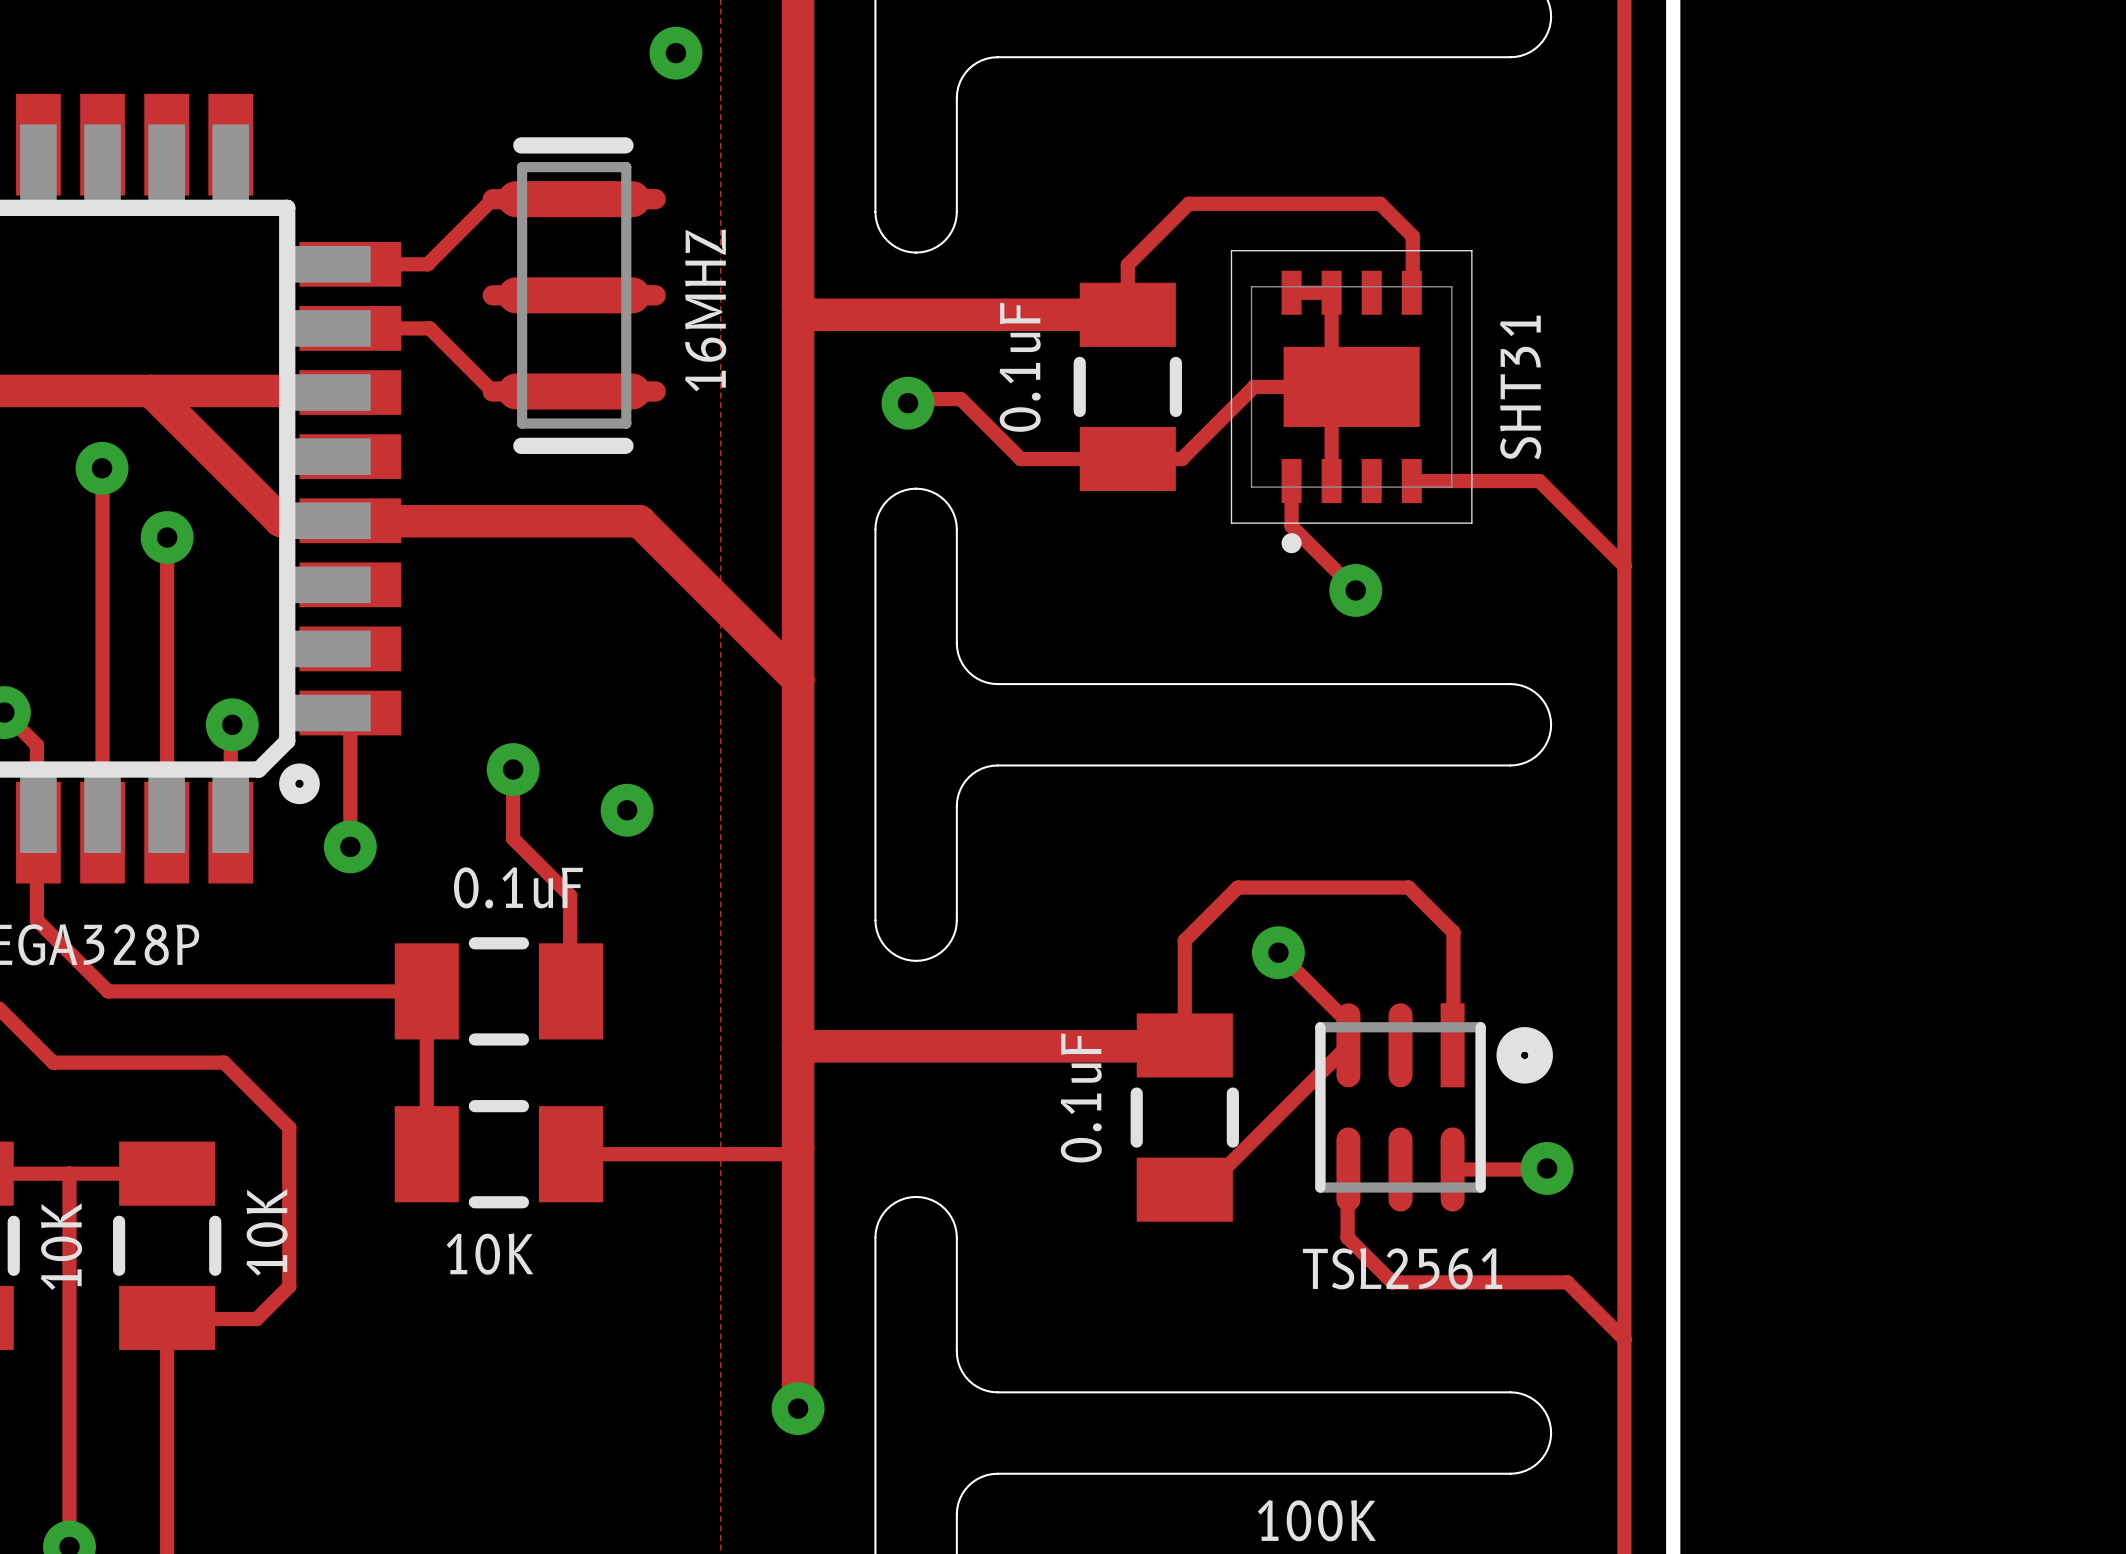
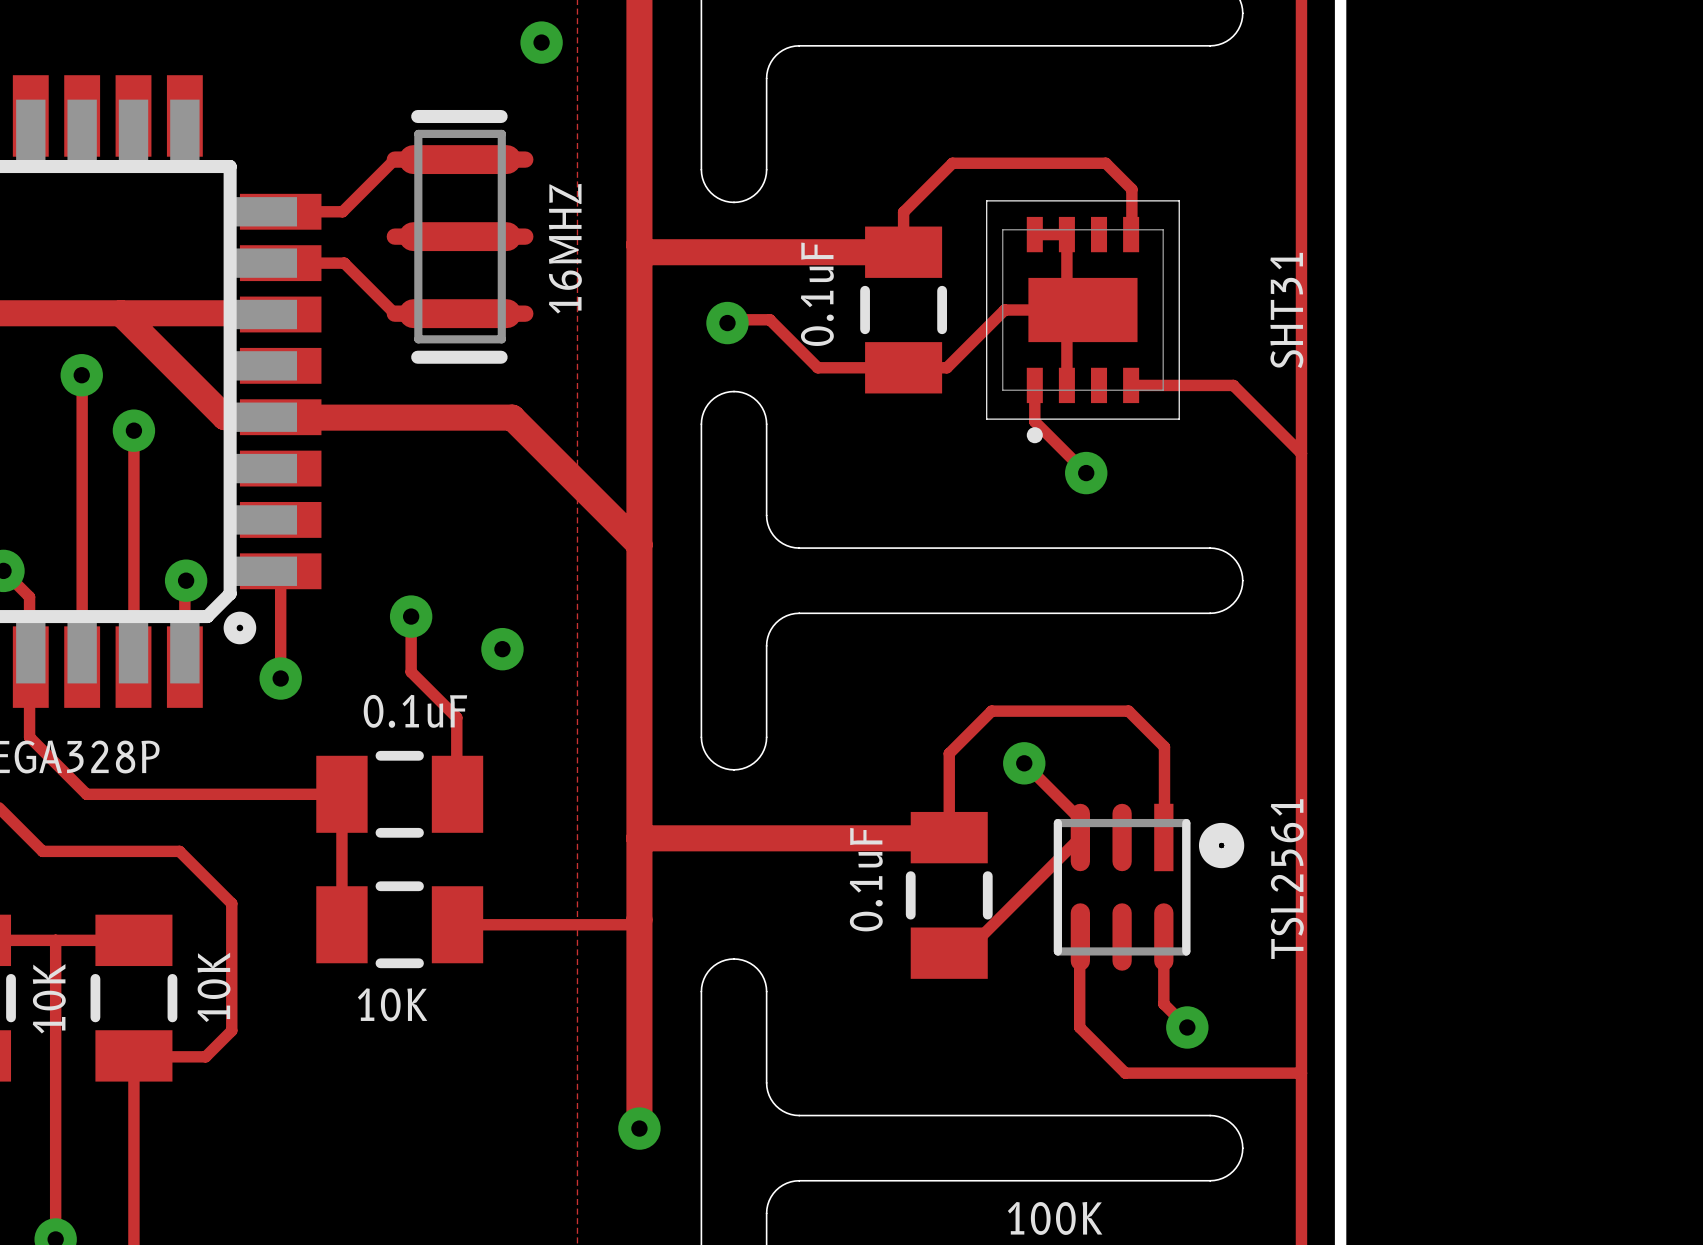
part value position: SHT31 (1520, 387) -> SHT31 (1286, 310)
via position: (1547, 1168) -> (1187, 1027)
track: (1452, 1169) (1546, 1169) -> (1163, 937) (1163, 1003) (1187, 1027)
track: (1347, 1237) (1392, 1282) (1567, 1282) (1624, 1339) -> (1079, 991) (1079, 1027) (1125, 1073) (1301, 1073)
part value rotation: 0° (1402, 1268) -> 90° counterclockwise (1287, 879)
part value position: TSL2561 (1402, 1268) -> TSL2561 (1287, 879)

